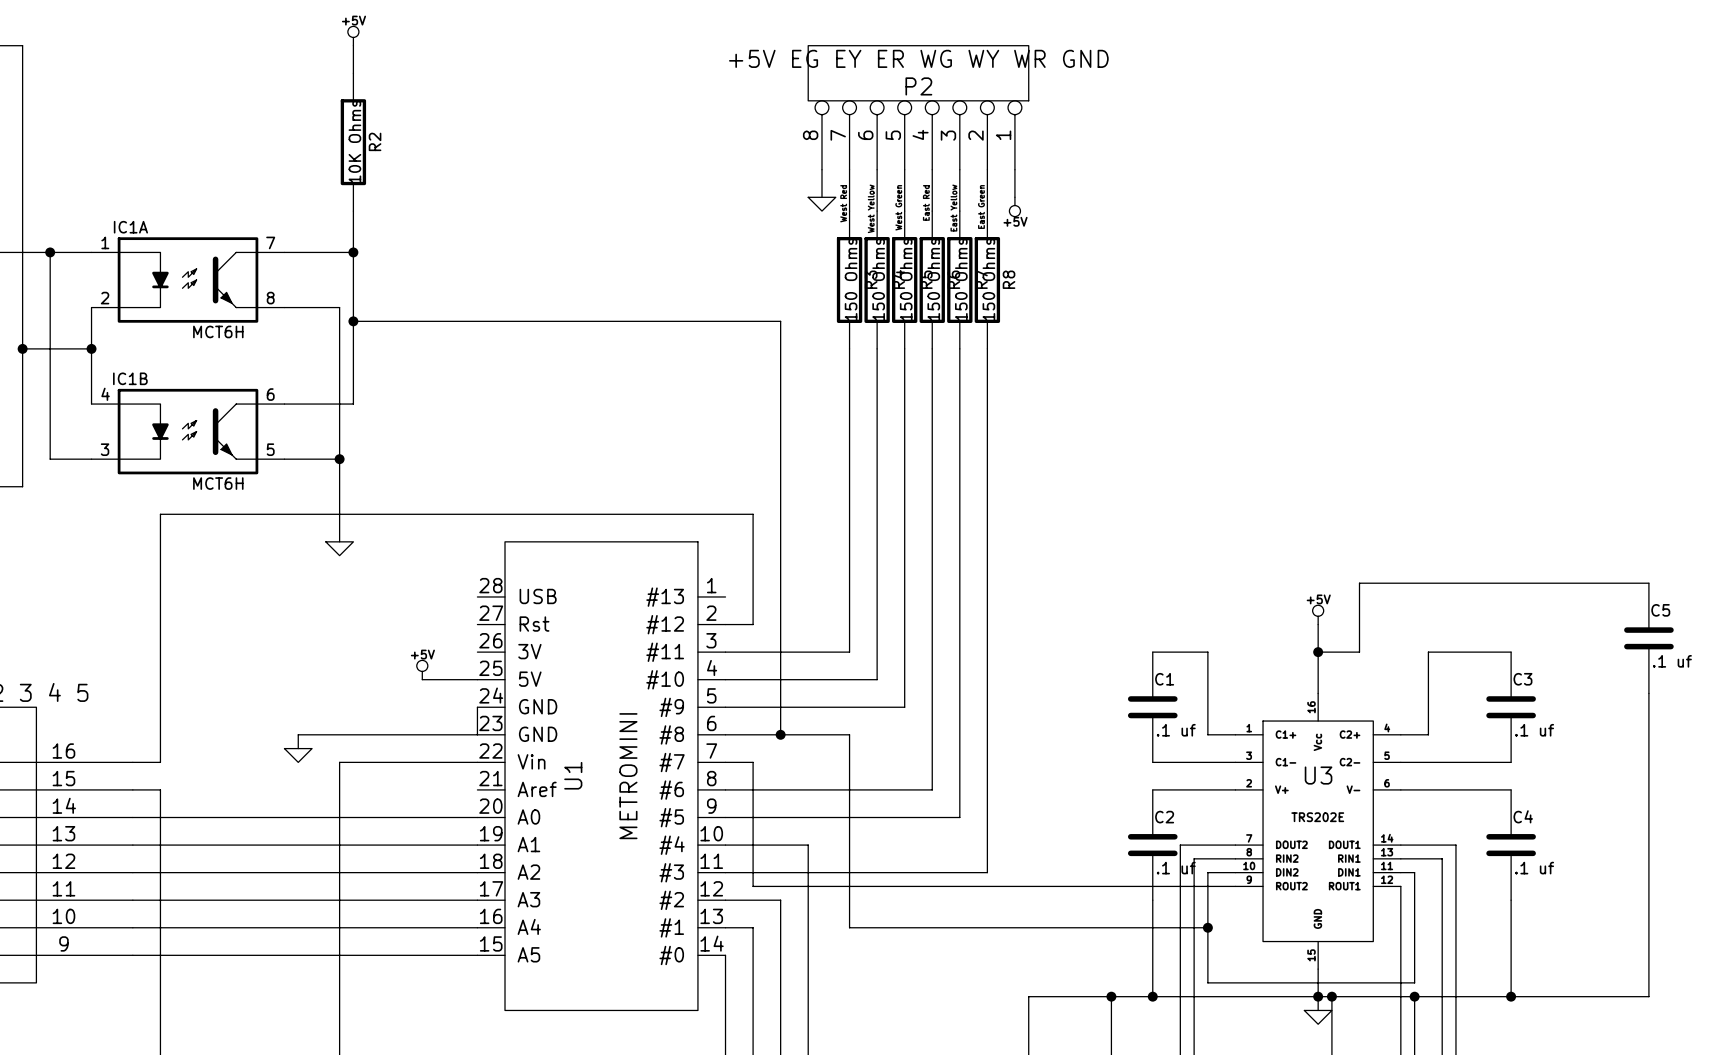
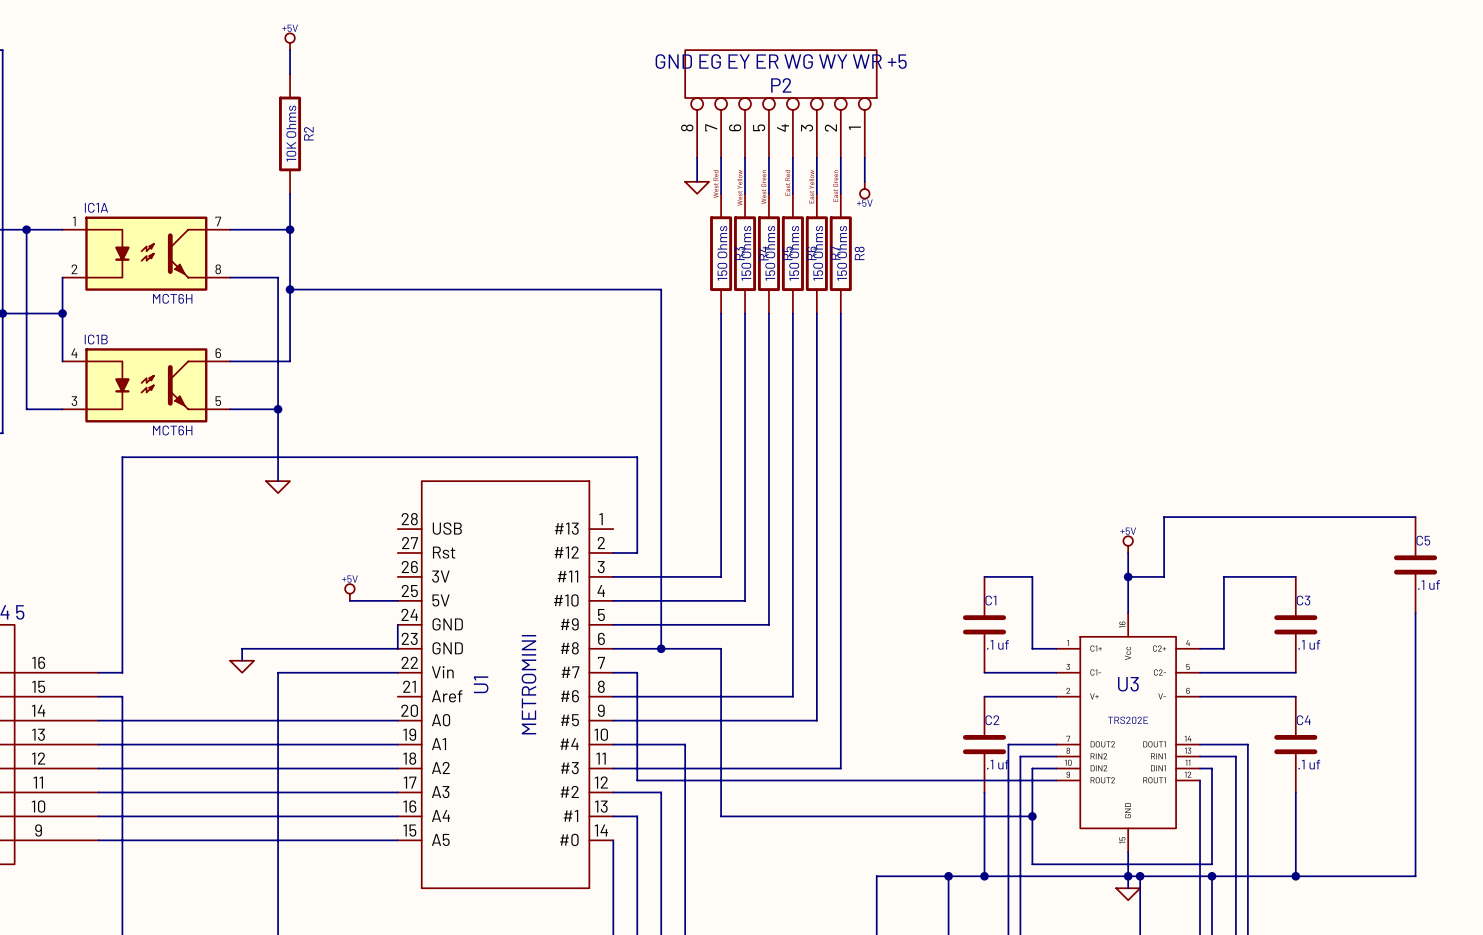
P2 value: +5V EG EY ER WG WY WR GND (918, 58) -> GND EG EY ER WG WY WR +5 (781, 61)

